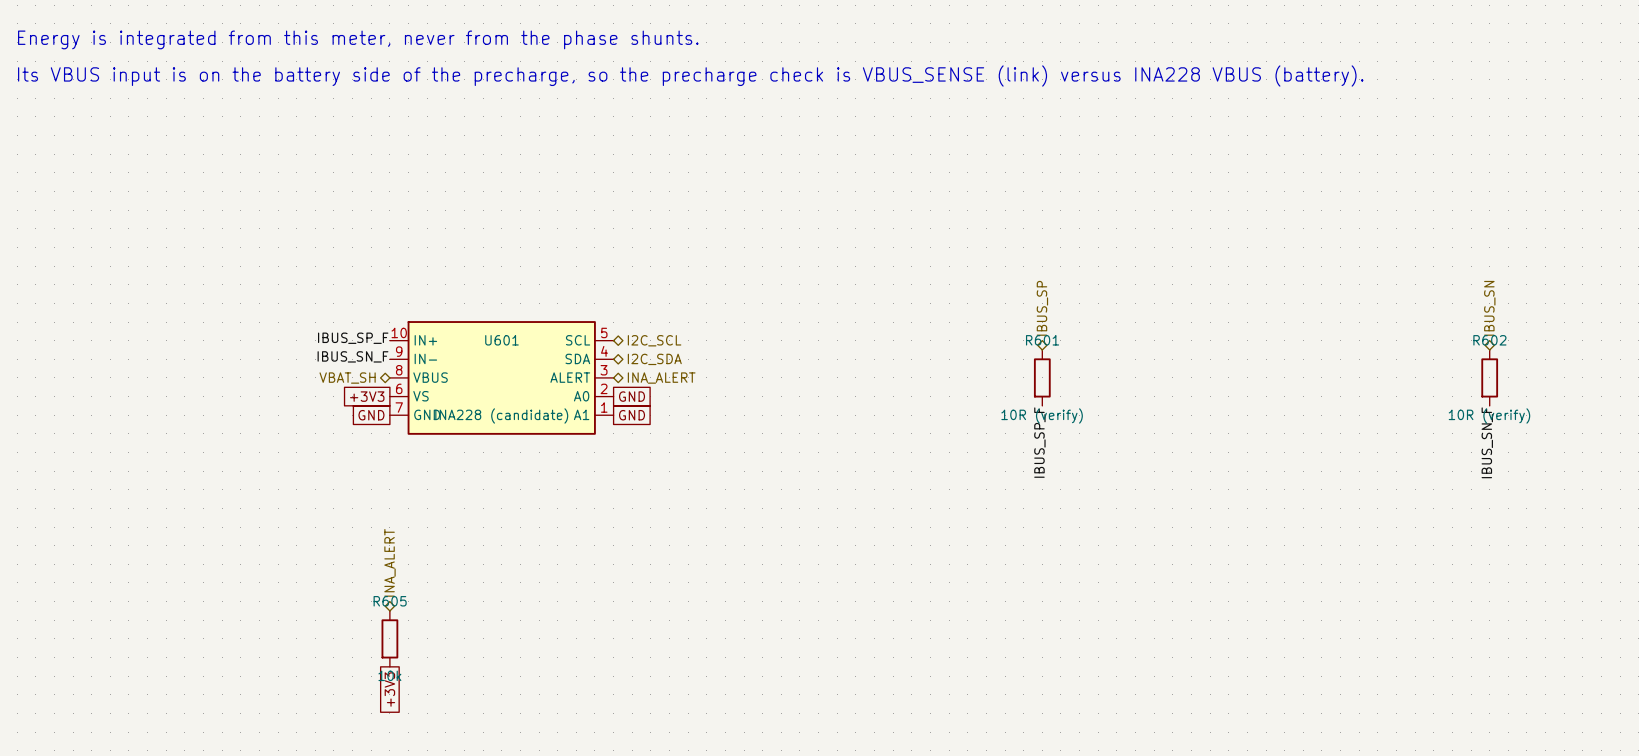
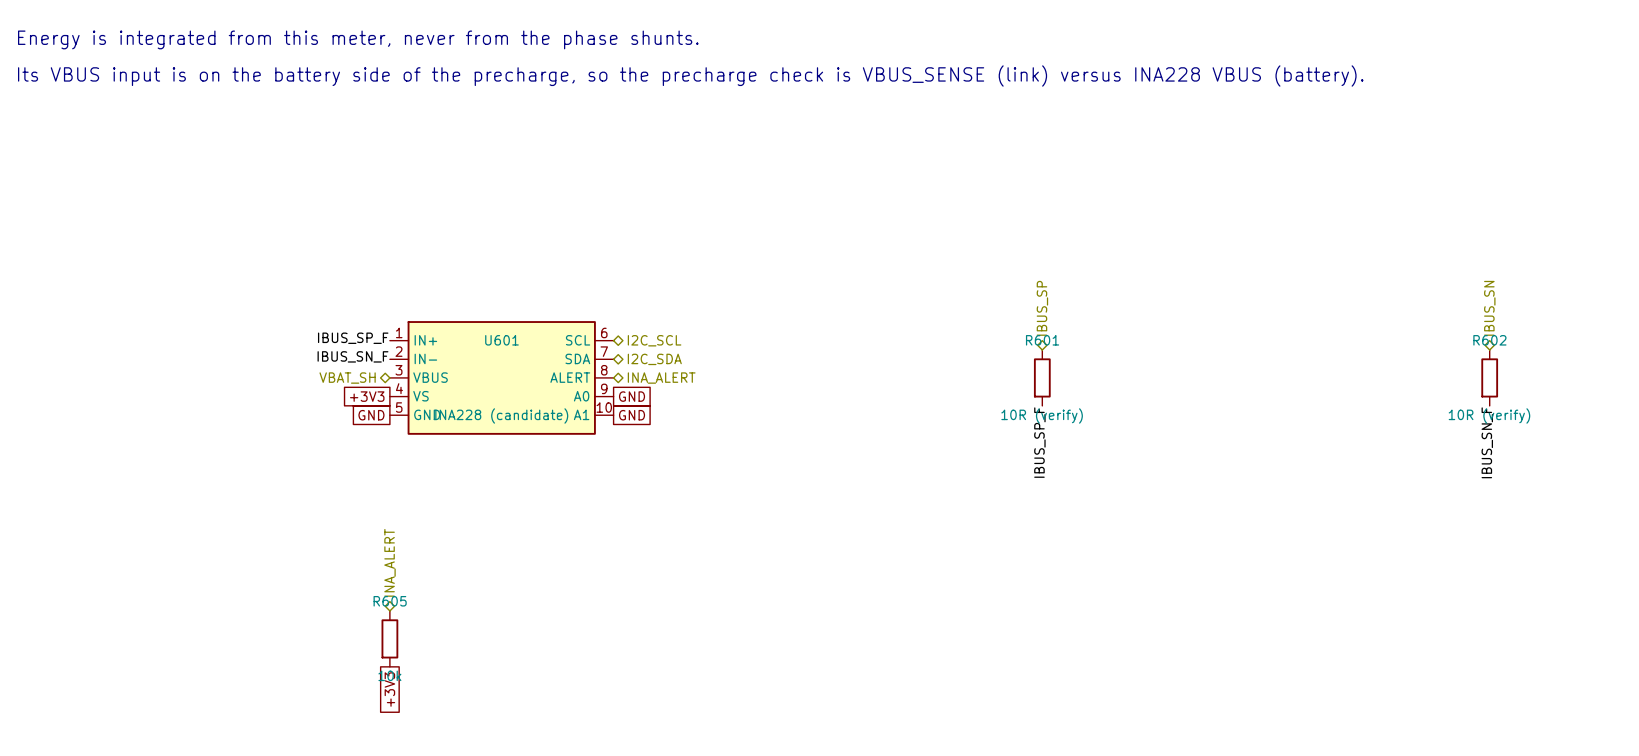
U601 symbol: [389, 321, 614, 435] -> [389, 321, 614, 435]

